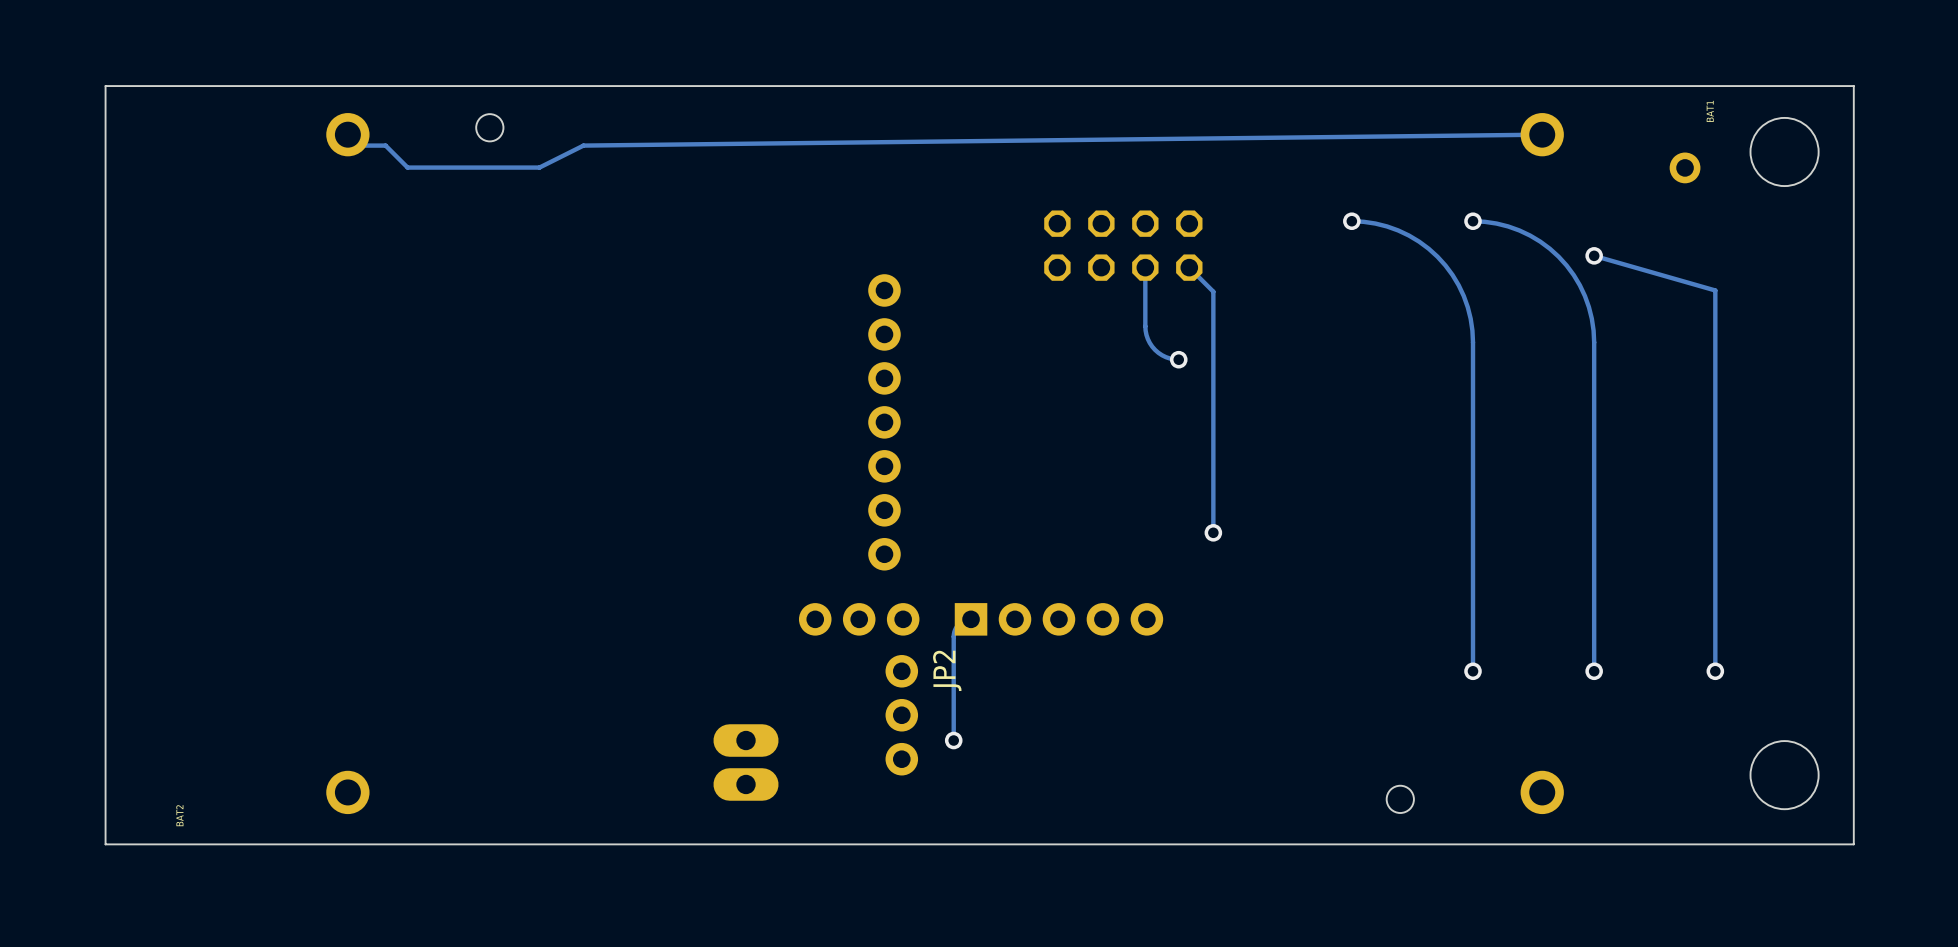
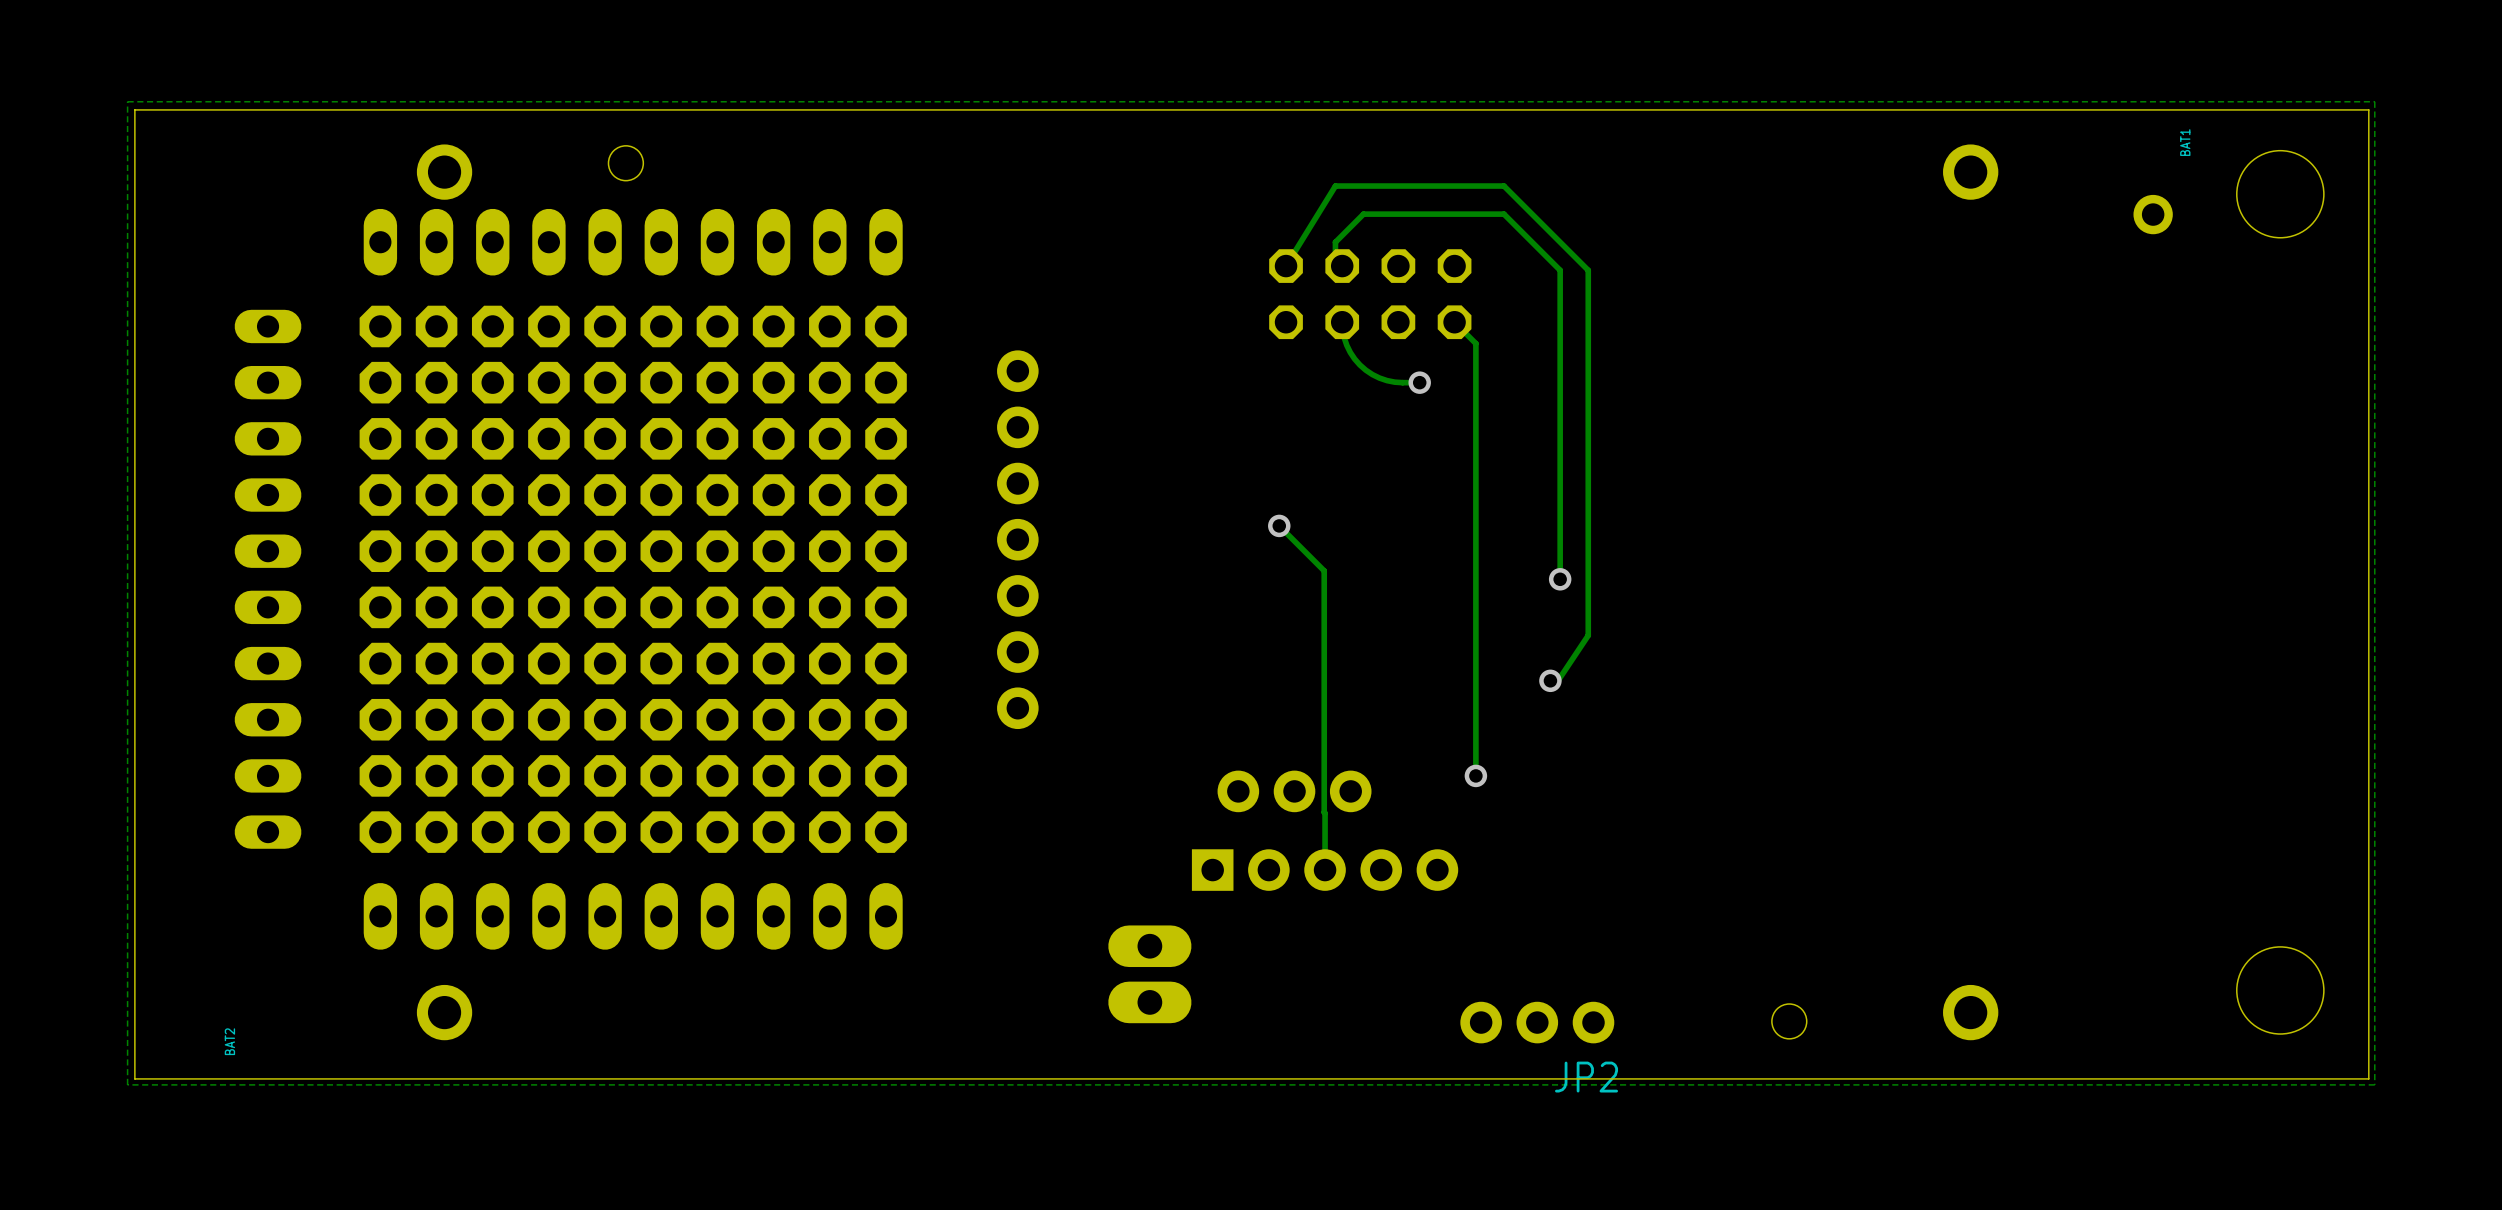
zone outline: none -> (2374, 101) (127, 101) (127, 1084) (2374, 1084) (2374, 101)
track: (1542, 134) (583, 145) (539, 167) (407, 167) (385, 145) (341, 145) (347, 134) -> none
part: none -> (633, 242)
track: none -> (1286, 266) (1335, 186) (1503, 186) (1588, 270) (1588, 635) (1554, 686)
track: none -> (1342, 266) (1335, 259) (1335, 242) (1363, 214) (1503, 214) (1560, 270) (1560, 579)
track: (1351, 221) (1387, 226) (1419, 241) (1437, 256) (1452, 275) (1467, 307) (1473, 342) (1473, 671) -> none
via: (1351, 221) -> none
track: (1473, 221) (1508, 226) (1540, 241) (1558, 256) (1573, 275) (1588, 307) (1594, 342) (1594, 671) -> none
via: (1473, 221) -> none
part position: (1123, 245) -> (1370, 294)
track: none -> (1342, 322) (1346, 345) (1354, 359) (1365, 370) (1387, 380) (1419, 382)
track: none -> (1454, 322) (1475, 343) (1475, 775)
track: (1594, 255) (1715, 290) (1715, 671) -> none
via: (1594, 255) -> none
track: (1145, 267) (1145, 326) (1147, 339) (1158, 352) (1170, 358) (1178, 359) -> none
track: (1189, 267) (1213, 291) (1213, 532) -> none
via: none -> (1419, 382)
via: (1178, 359) -> none
track: none -> (1279, 525) (1324, 570) (1325, 870)
via: none -> (1279, 525)
part position: (884, 422) -> (1017, 539)
part: none -> (268, 579)
part: none -> (408, 579)
part: none -> (520, 579)
part: none -> (633, 579)
part: none -> (745, 579)
part: none -> (857, 579)
via: none -> (1560, 579)
via: none -> (1475, 775)
part position: (859, 619) -> (1294, 791)
track: (971, 619) (960, 622) (953, 634) (953, 740) -> none
part position: (1058, 619) -> (1325, 870)
via: (1473, 671) -> none
via: (1594, 671) -> none
via: (1715, 671) -> none
JP2 rotation: 0° (901, 715) -> 90° clockwise (1537, 1022)
JP2 position: (901, 715) -> (1537, 1022)
part: none -> (633, 916)
via: (953, 740) -> none
part position: (746, 762) -> (1149, 974)

